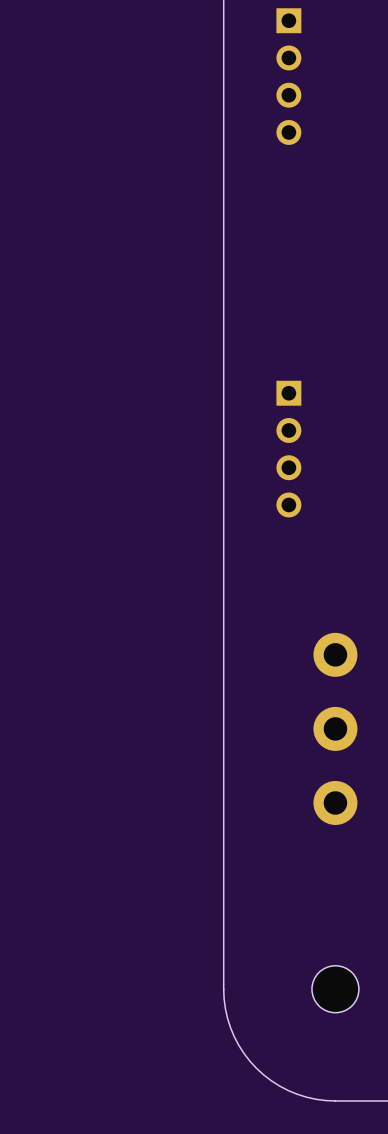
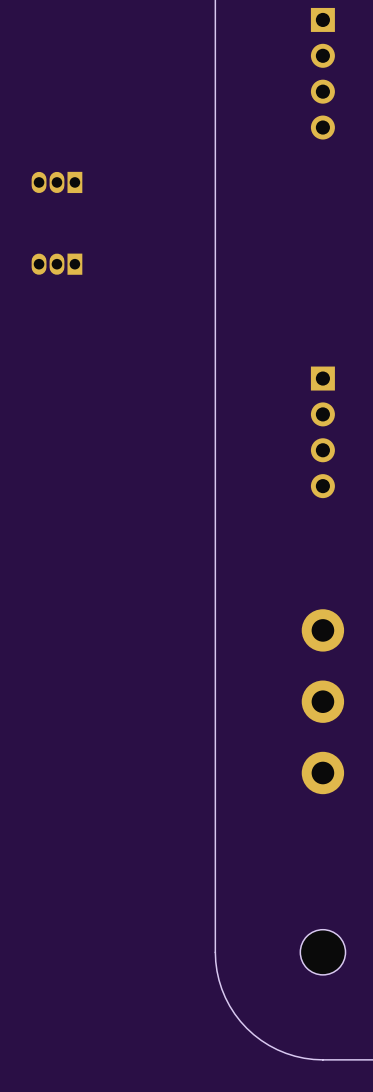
part position: (288, 76) -> (322, 73)
part: none -> (56, 182)
part: none -> (56, 264)
part position: (288, 449) -> (322, 432)

